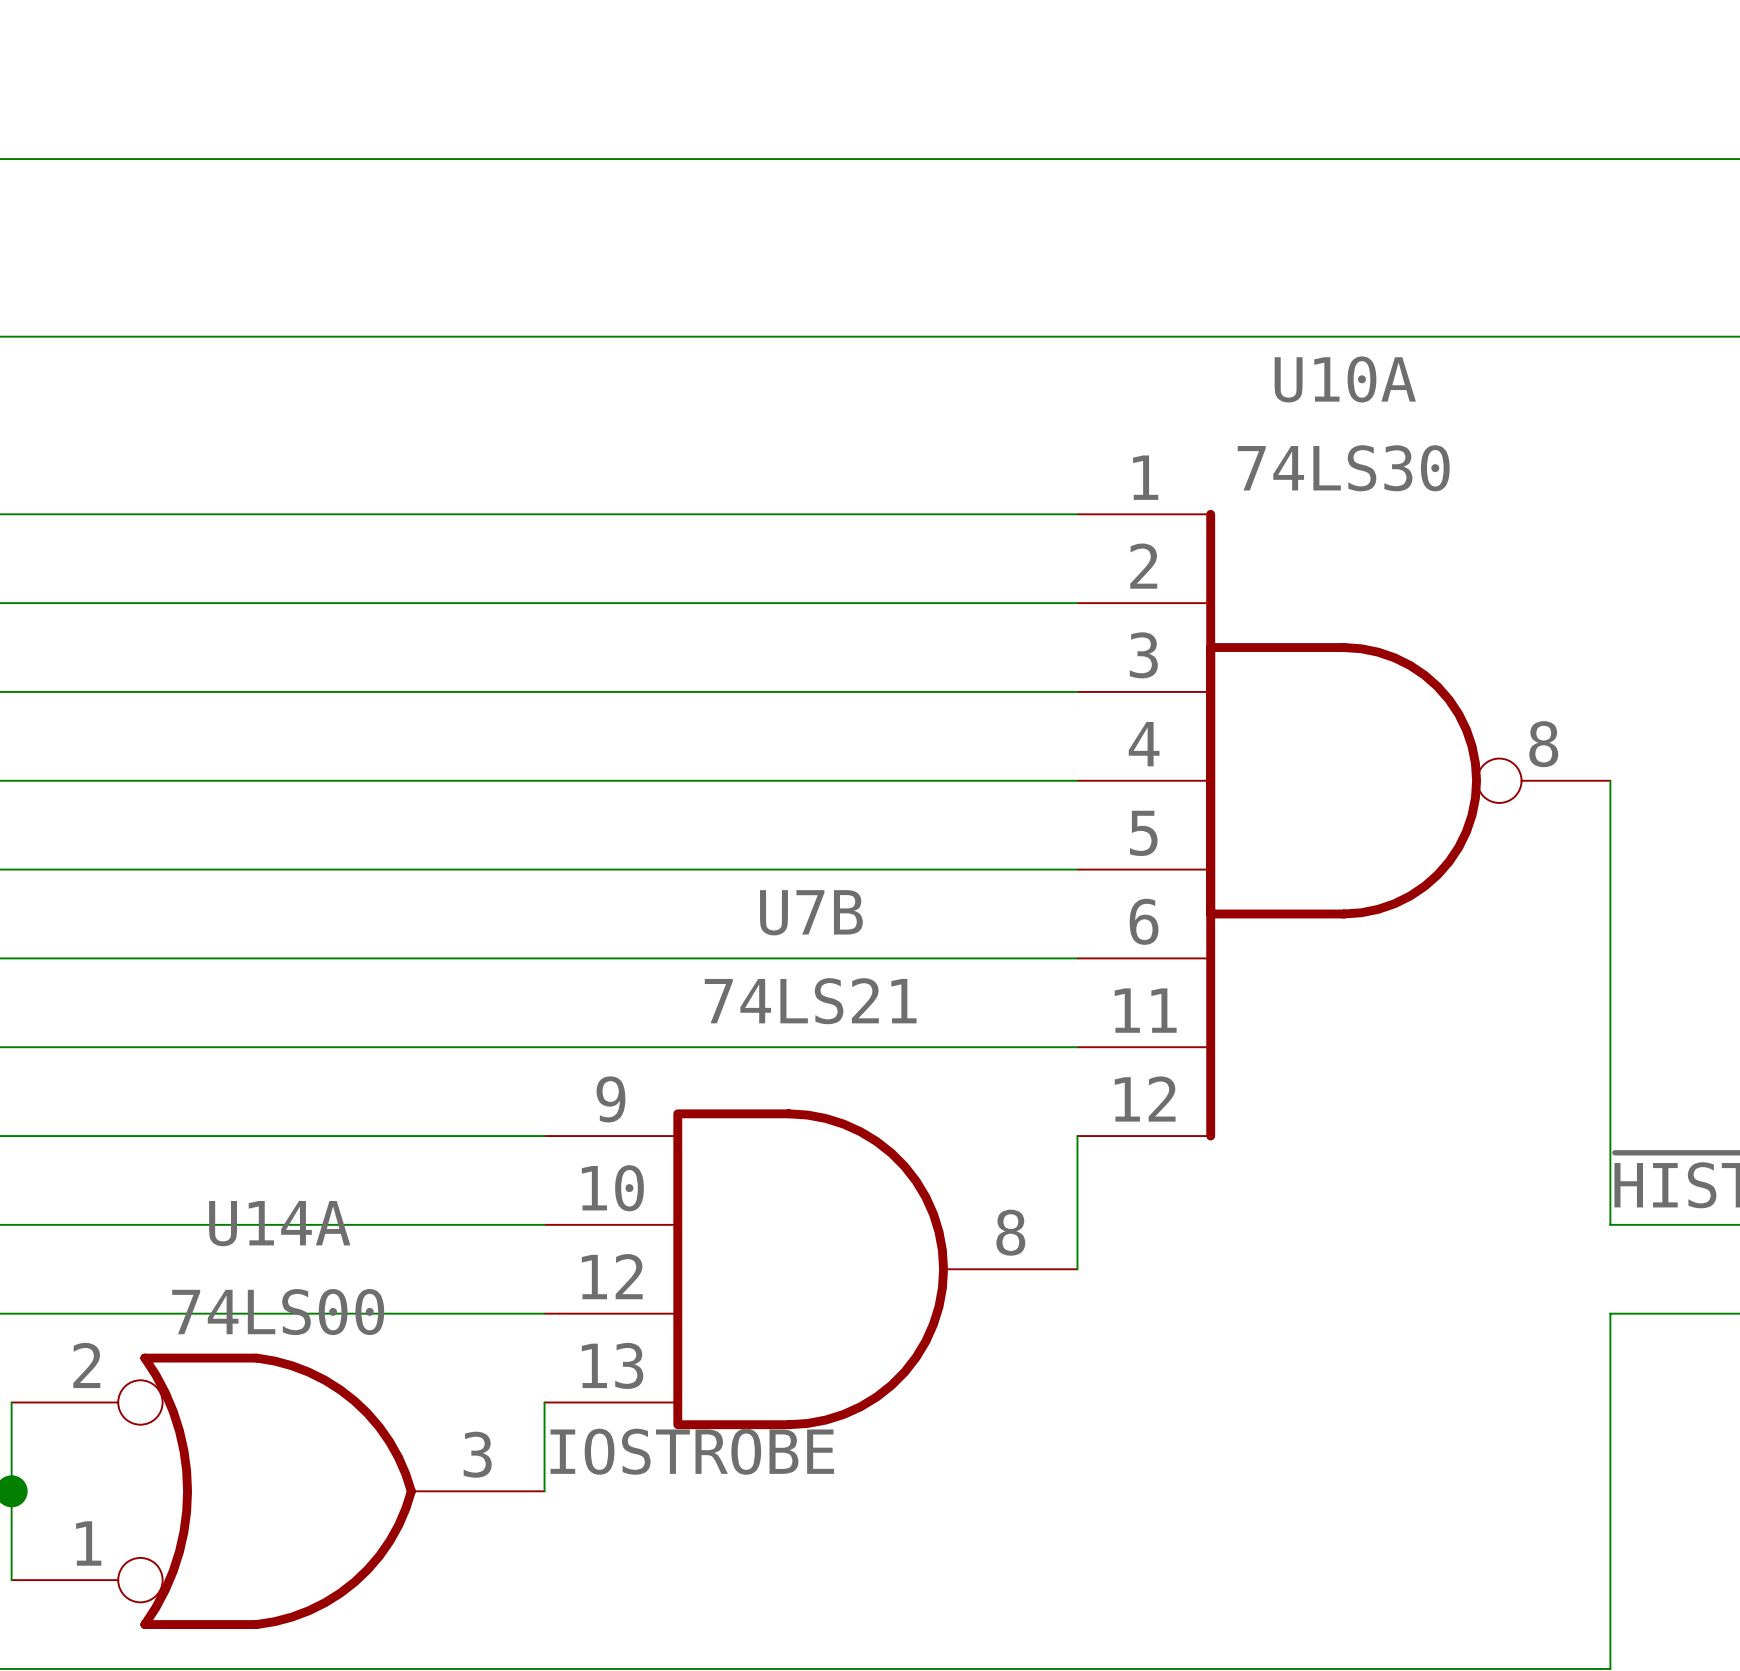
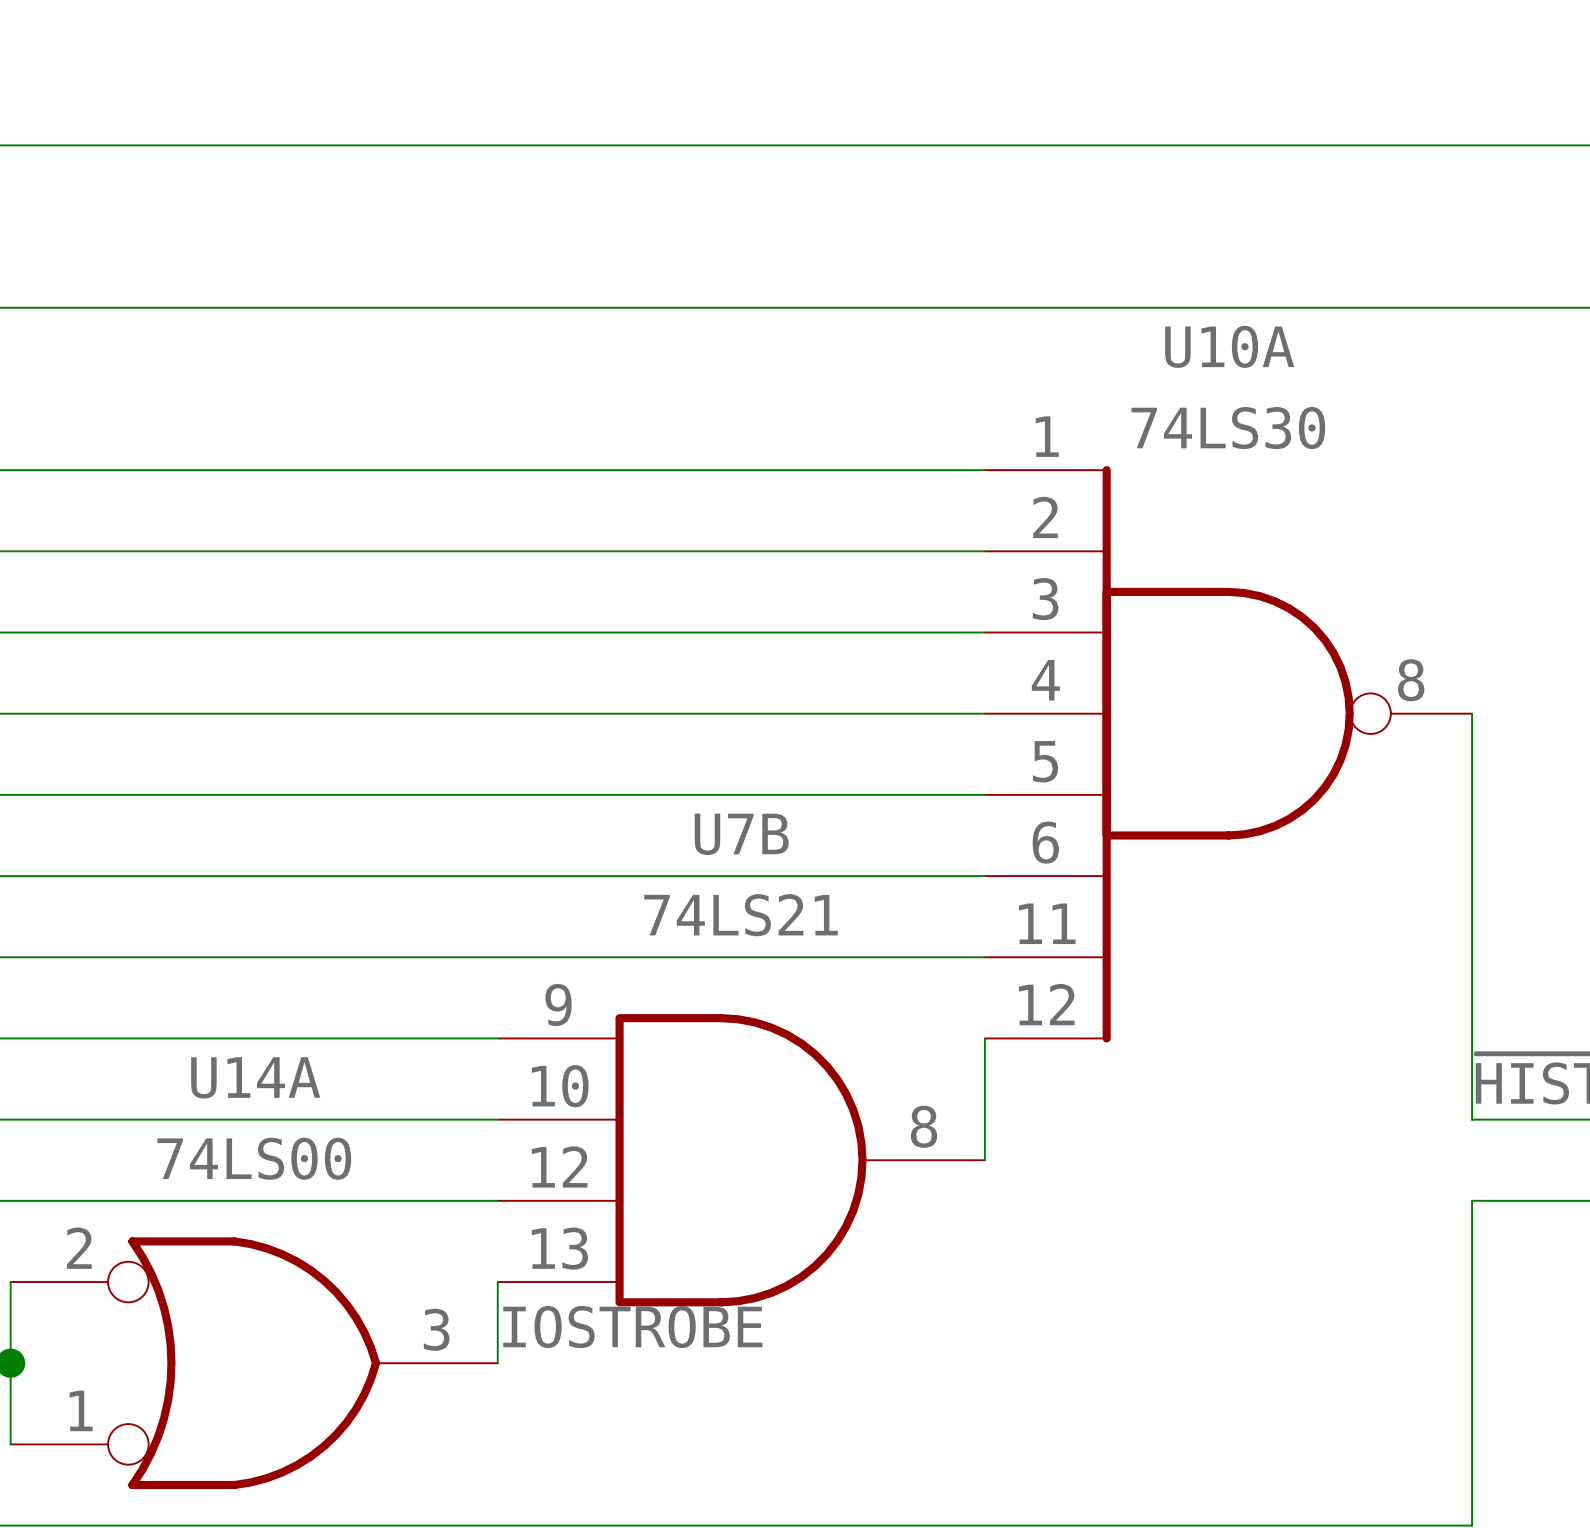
U14A name position: U14A (279, 1223) -> U14A (255, 1077)
U14A value position: 74LS00 (278, 1312) -> 74LS00 (254, 1158)

